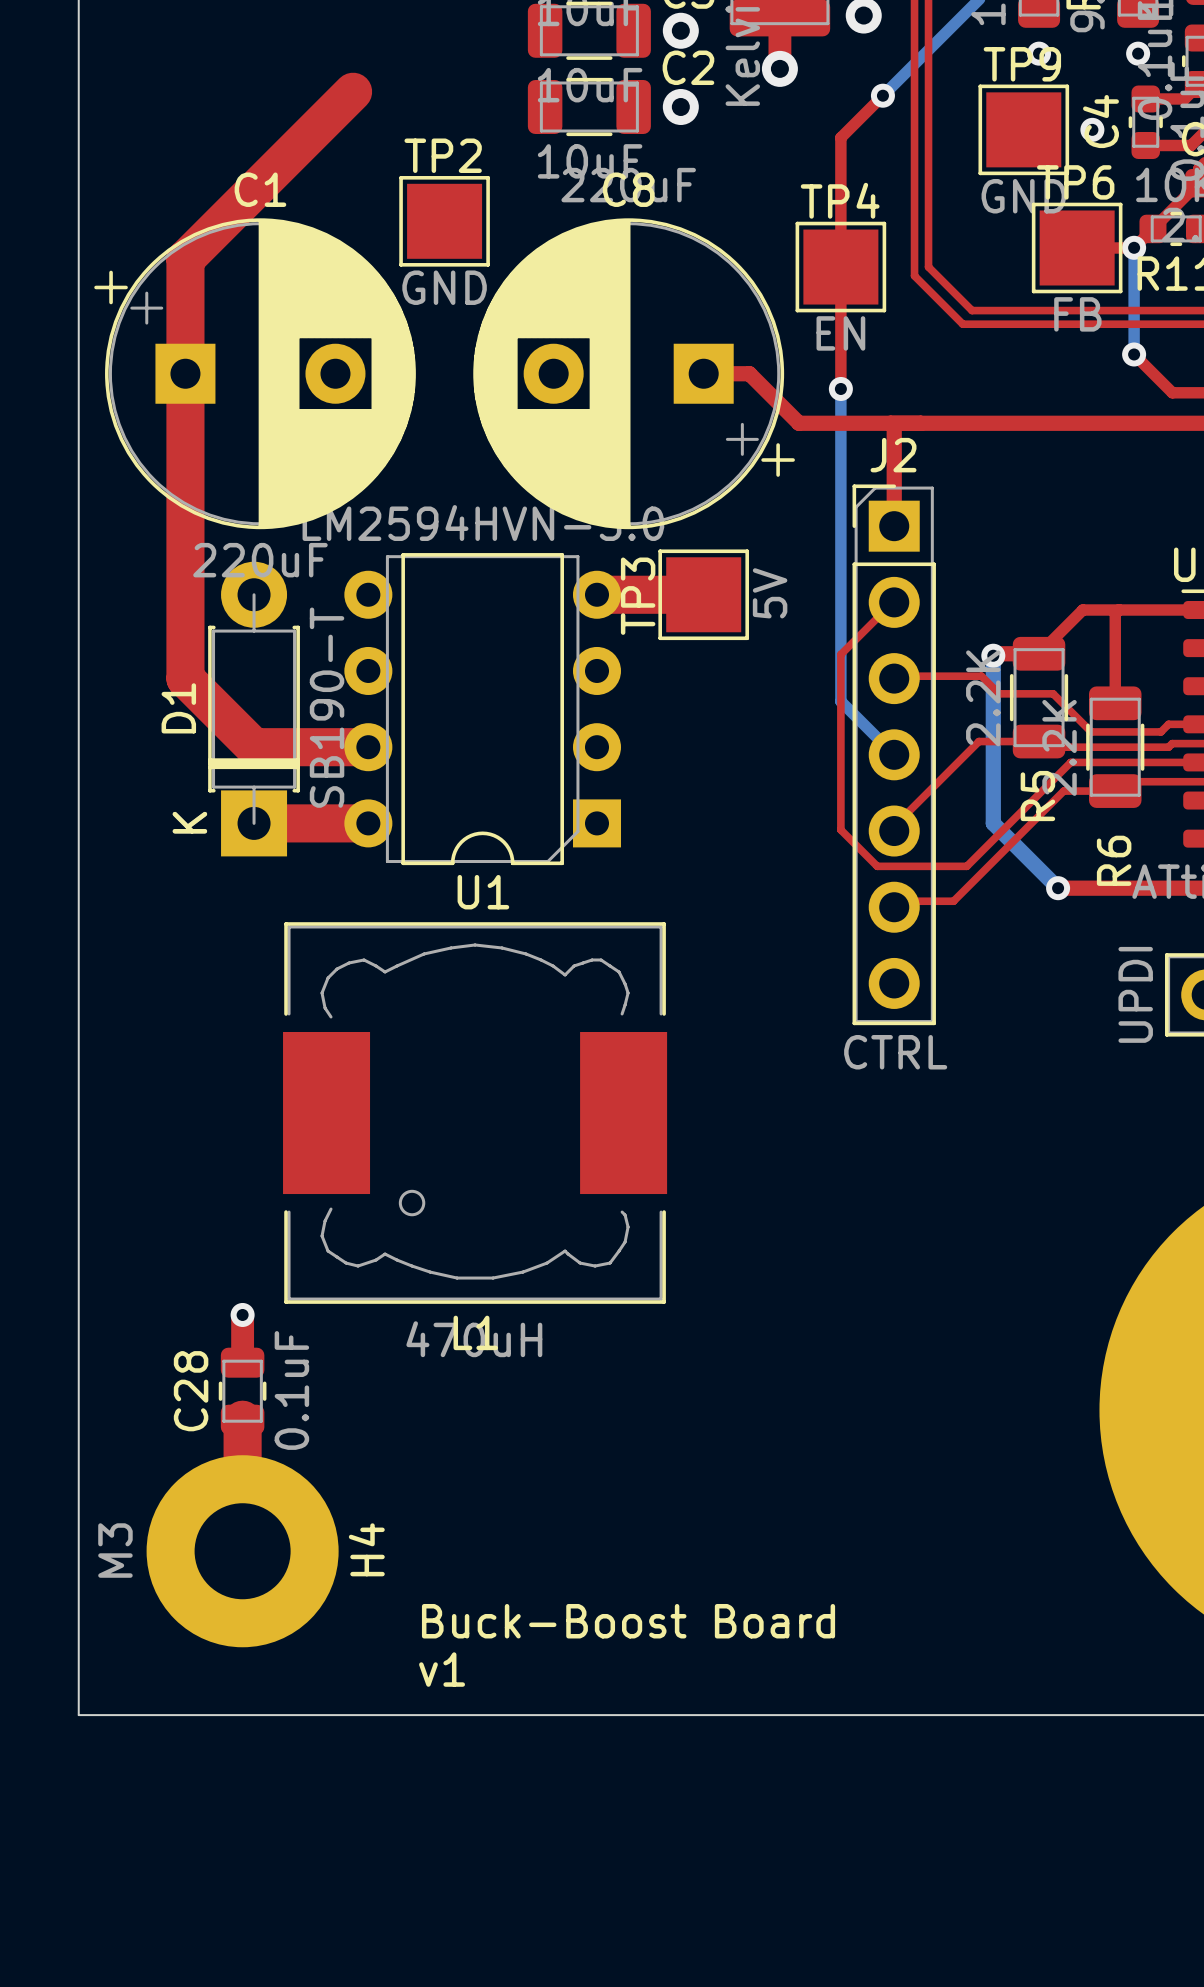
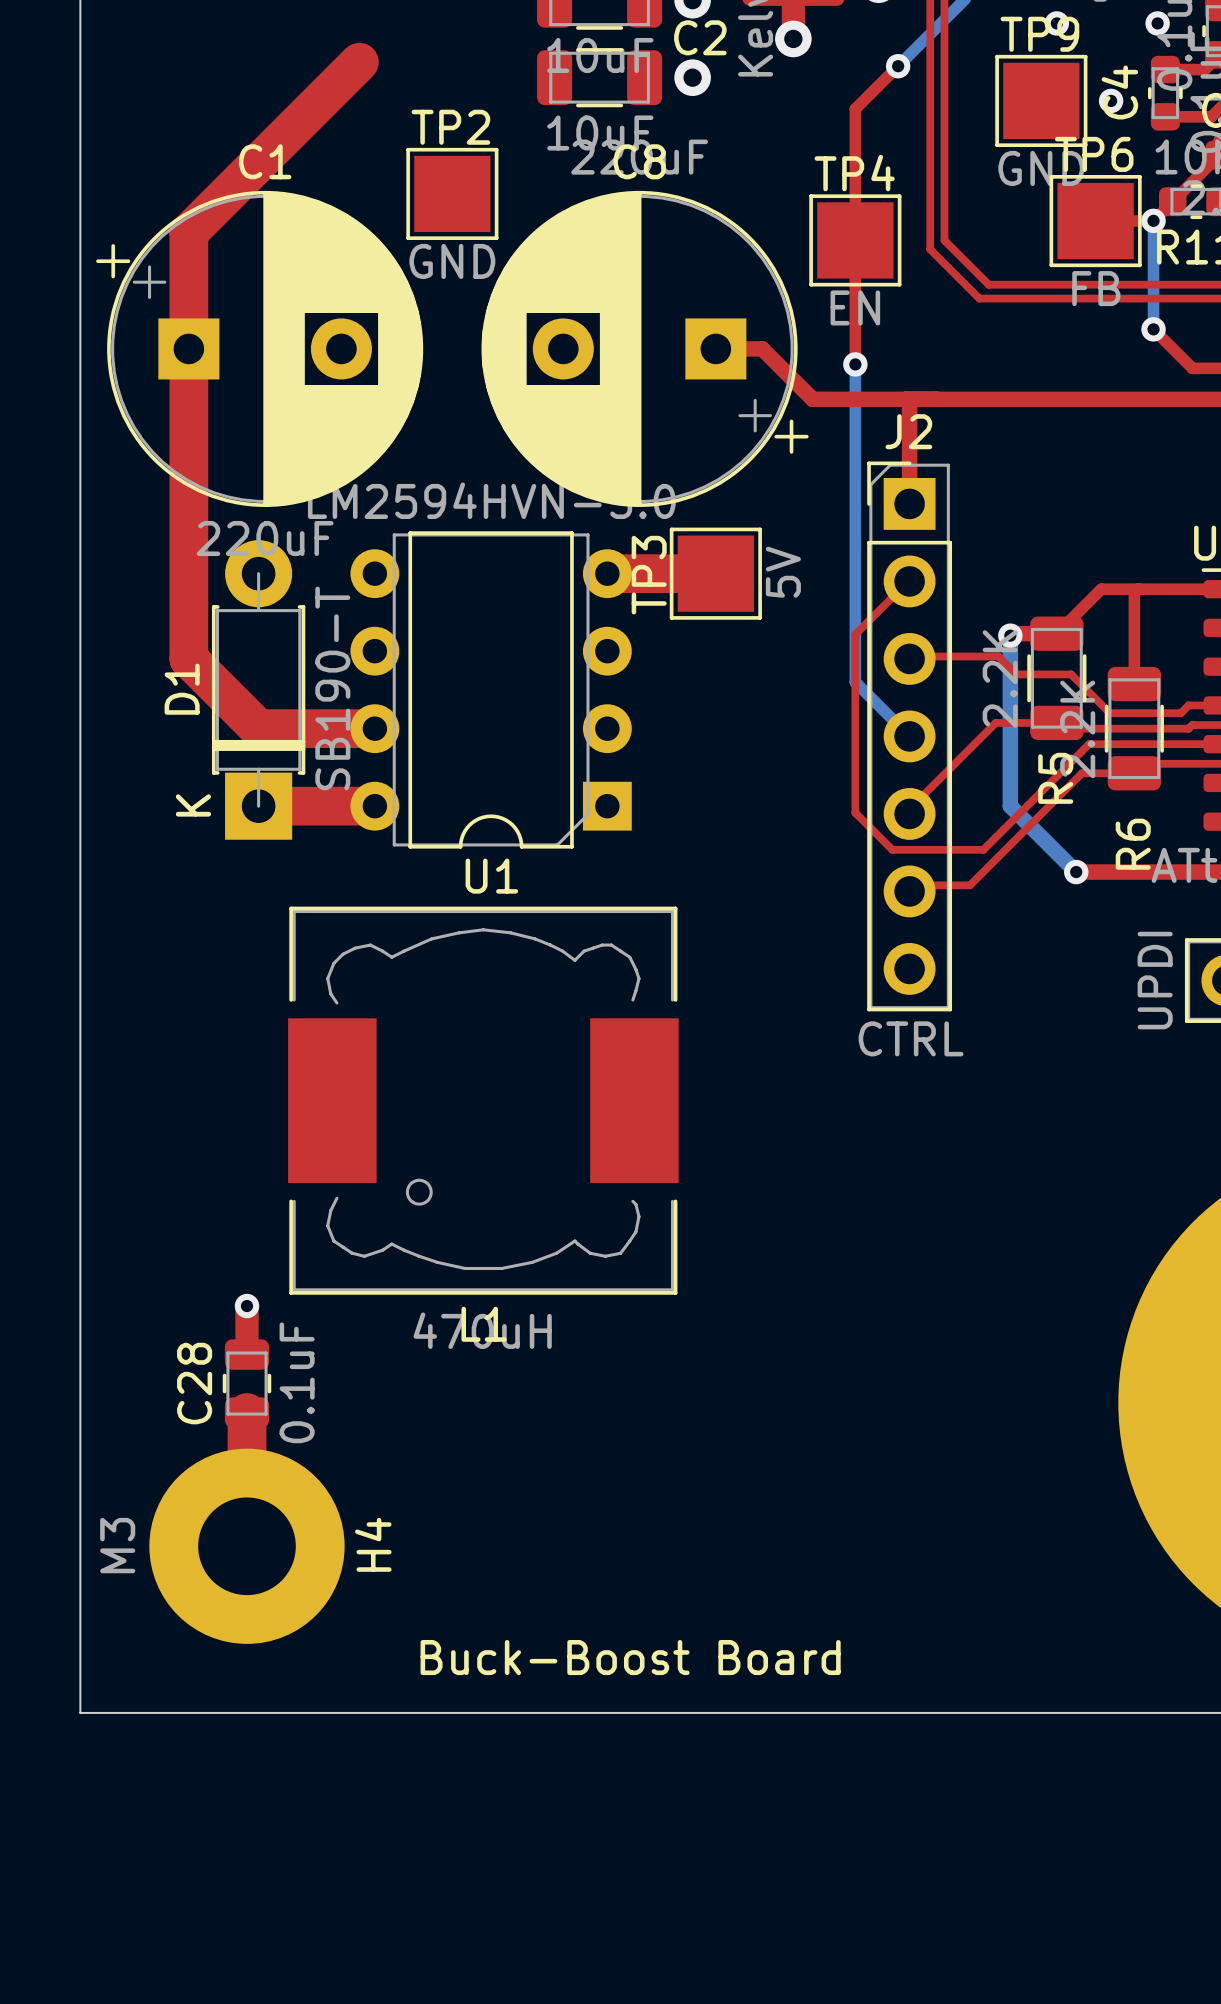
text position: Buck-Boost Board (628, 1621) -> Buck-Boost Board (630, 1657)
text: v1 (442, 1669) -> none

